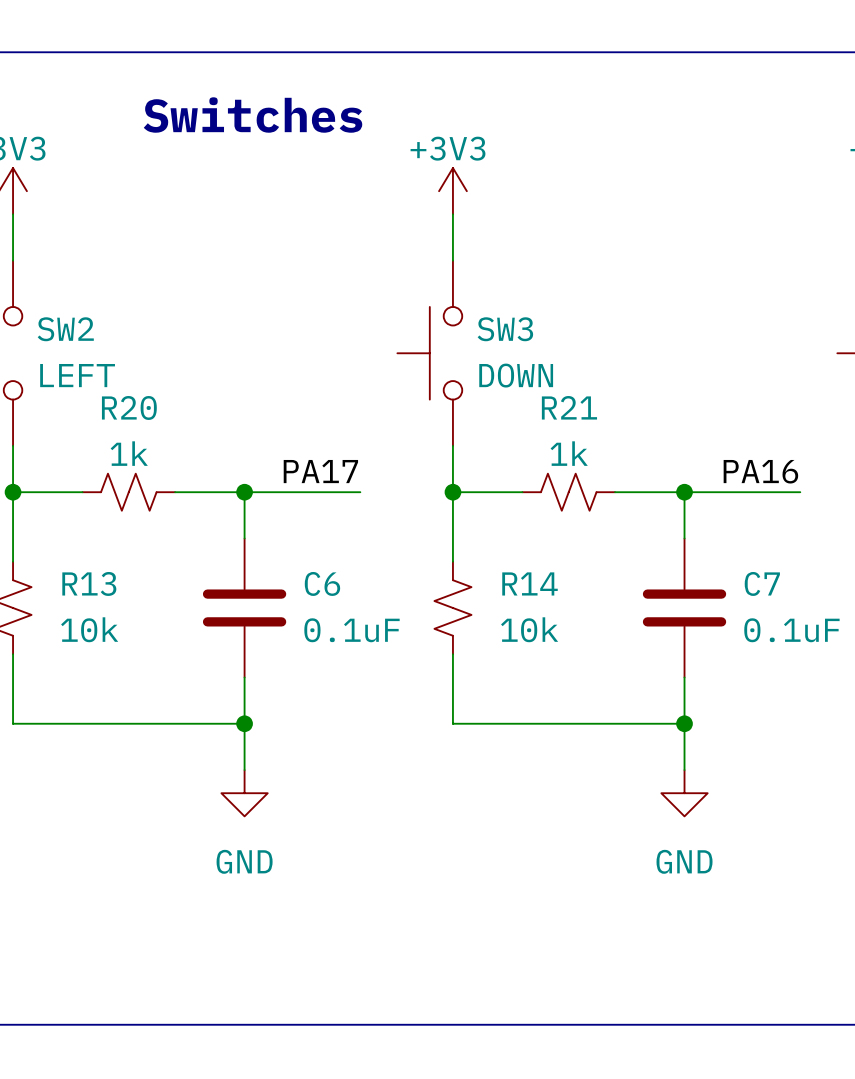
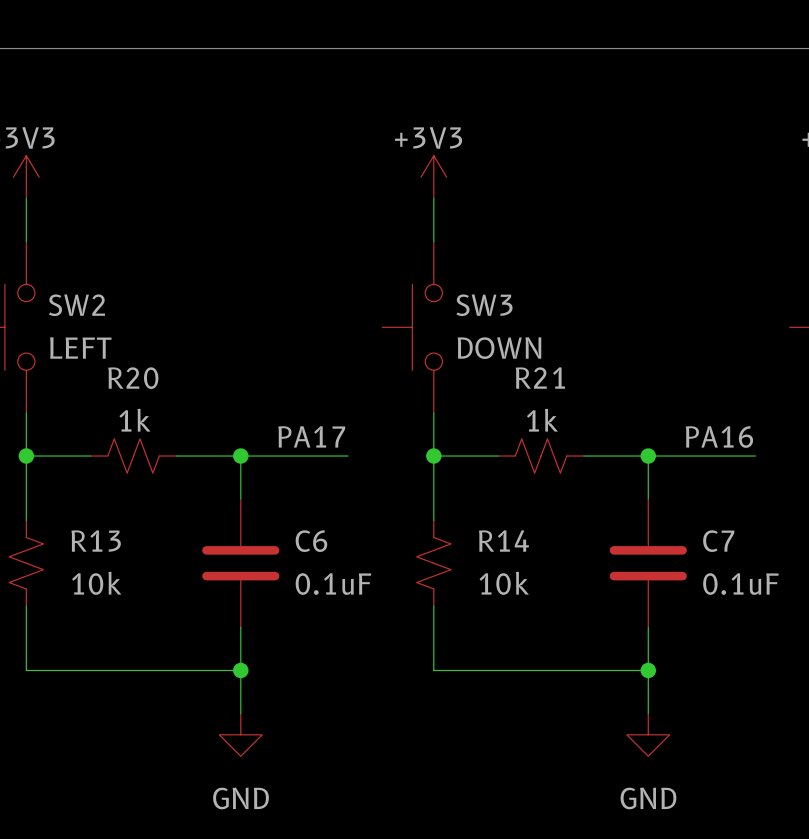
text: Switches (253, 115) -> none

